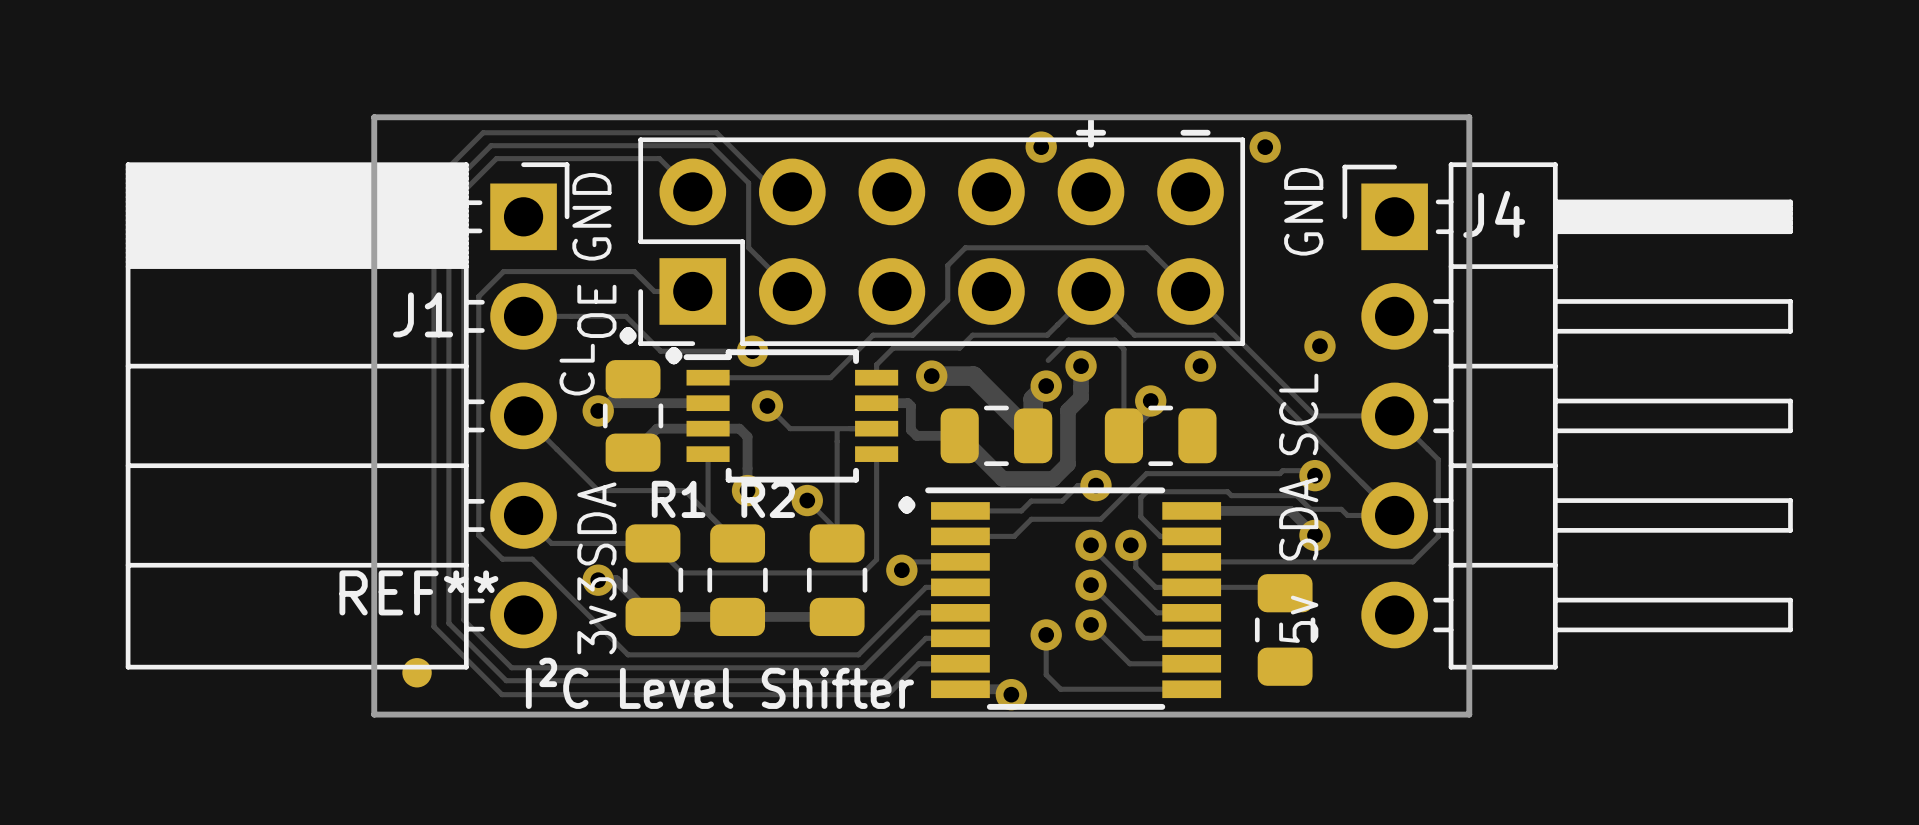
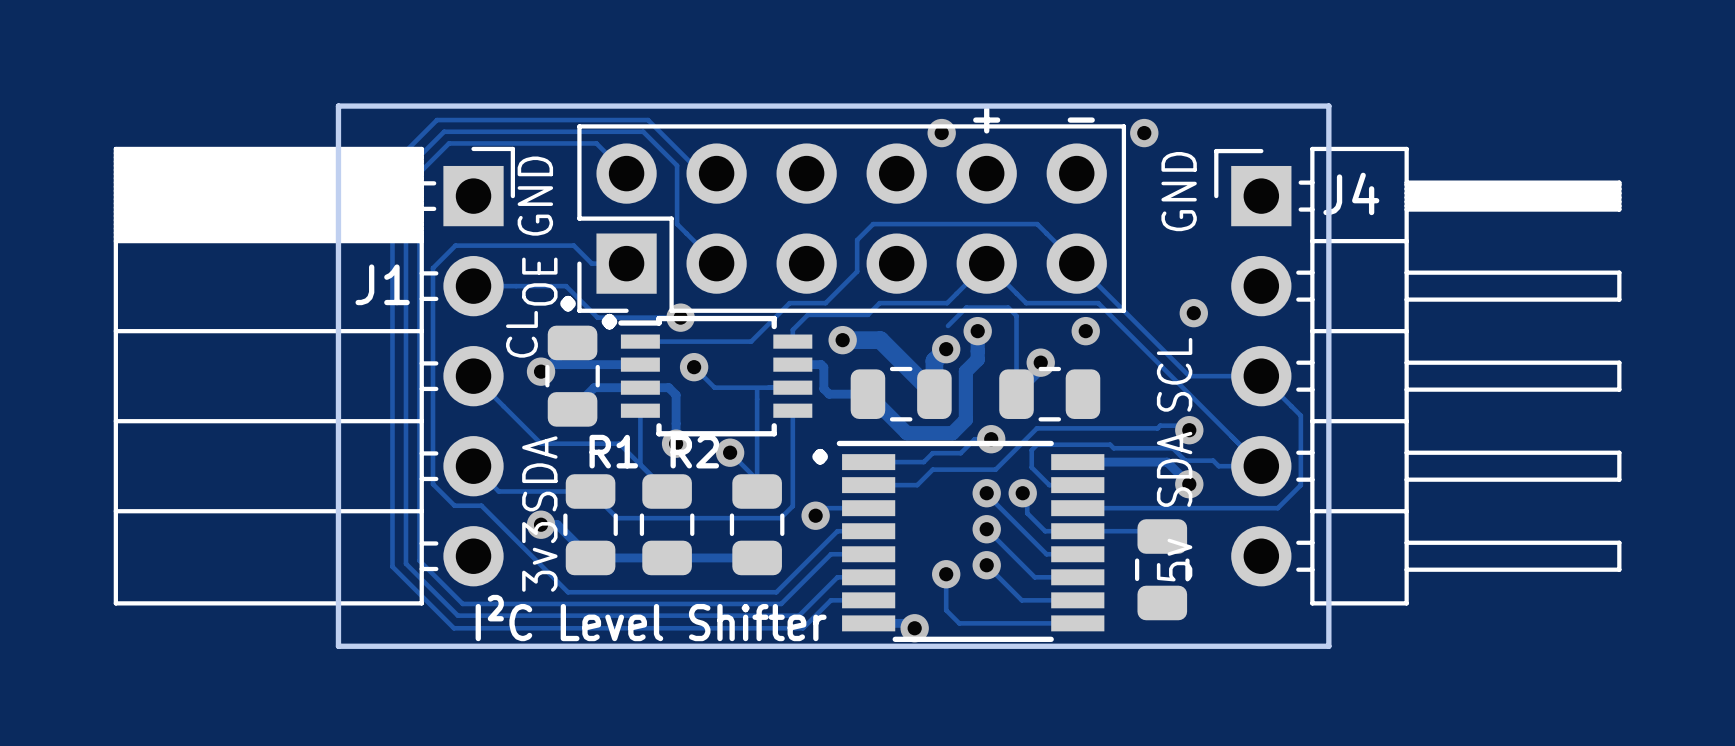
REF**: (417, 672) -> none

